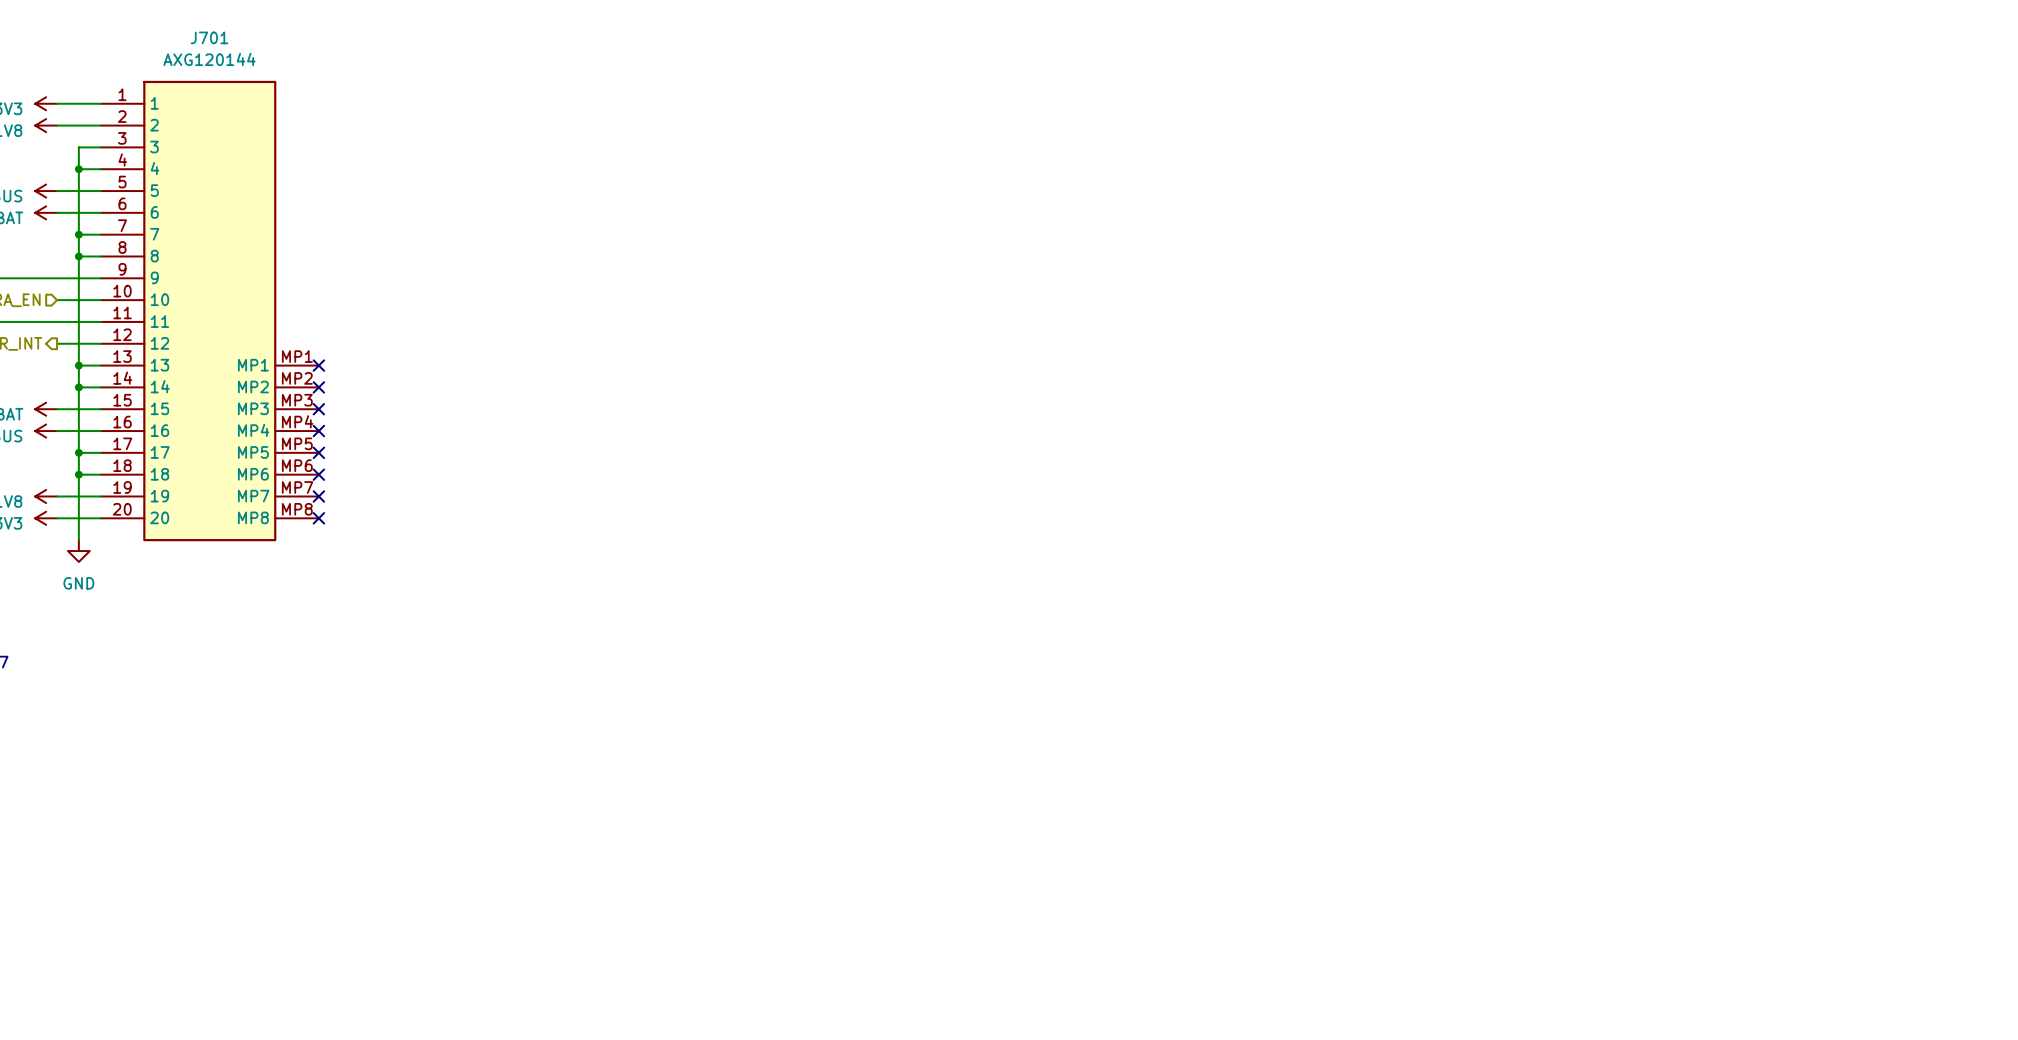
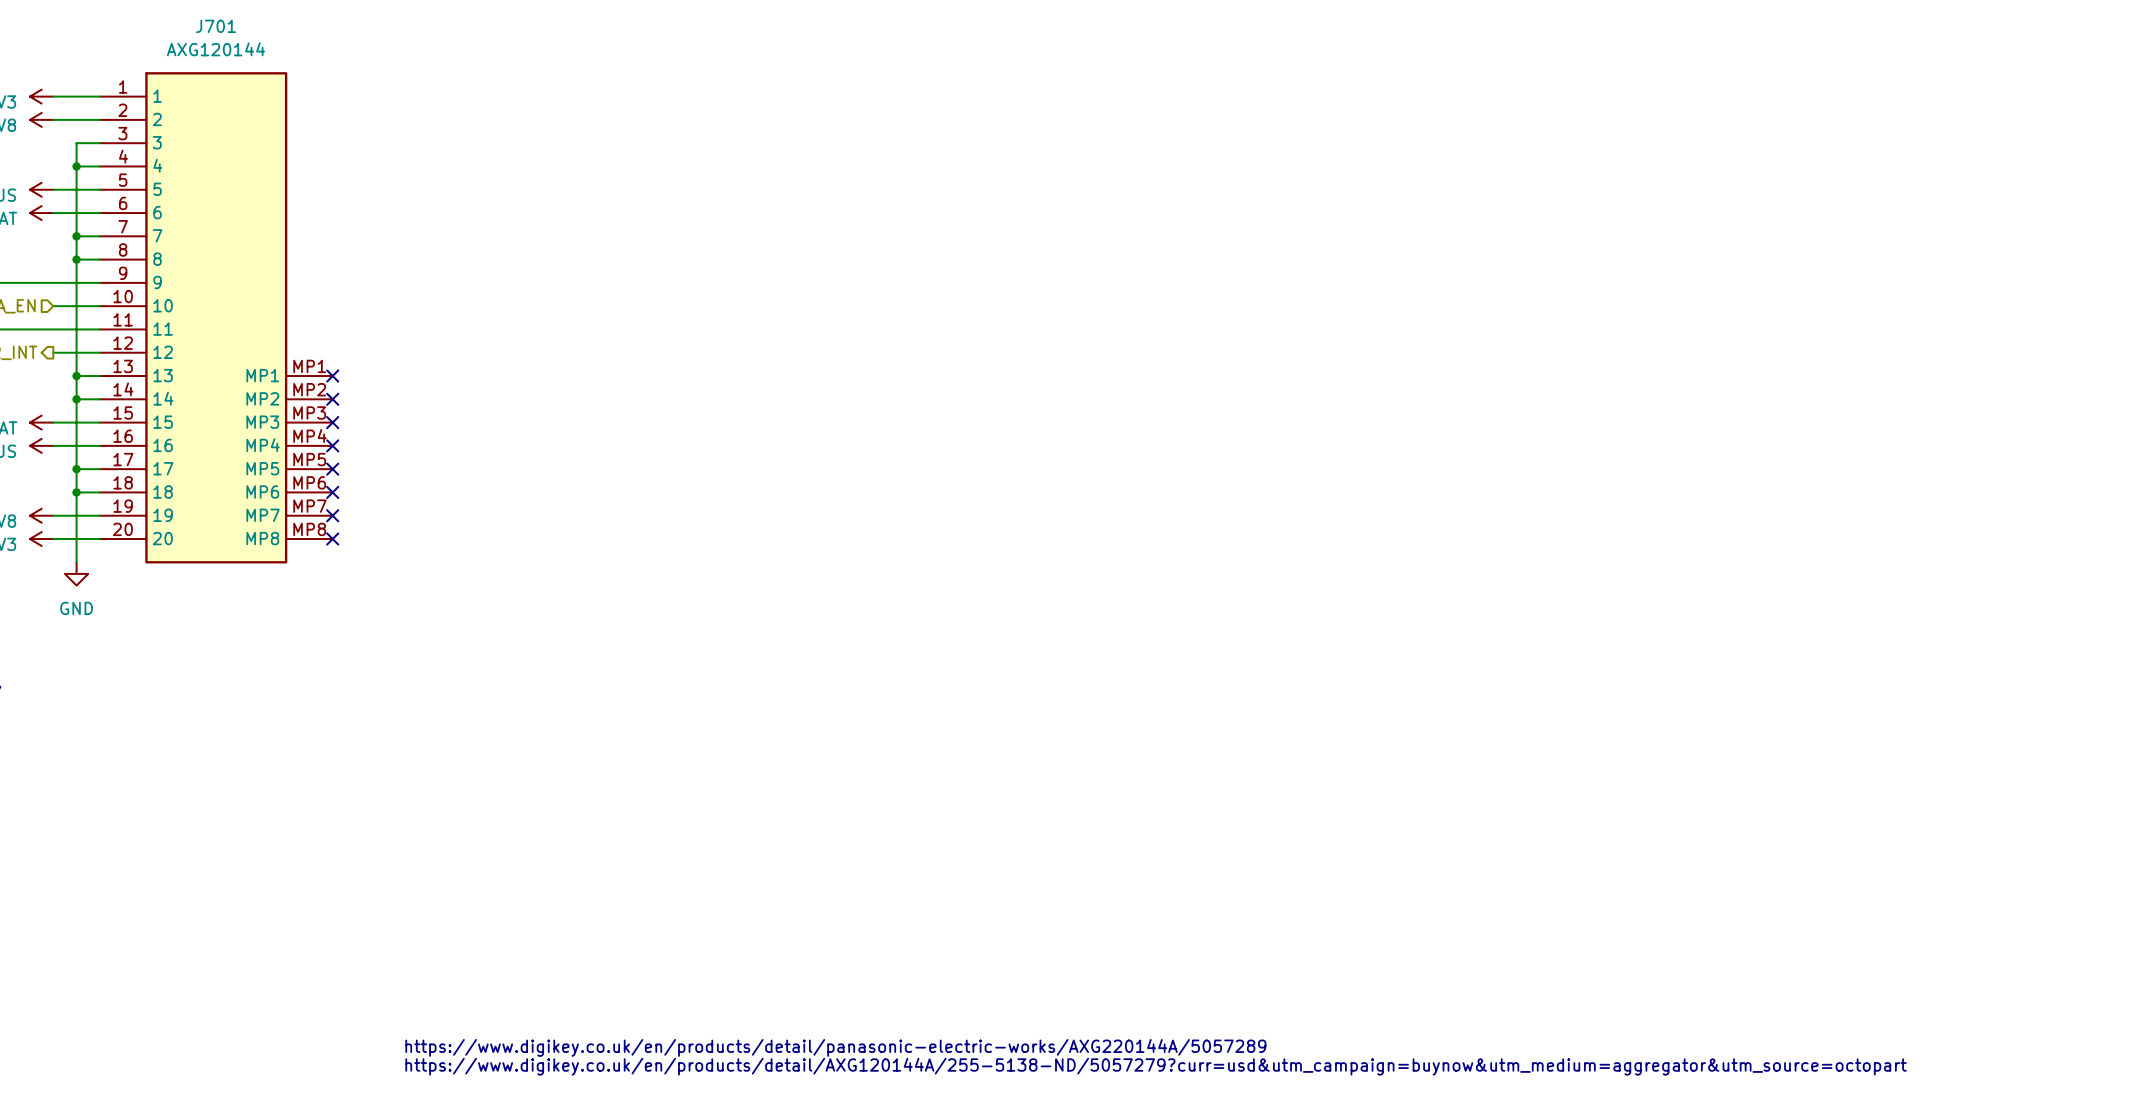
text: none -> https://www.digikey.co.uk/en/products/detail/panasonic-electric-works/AXG220144A/5057289 (835, 1047)
text: none -> https://www.digikey.co.uk/en/products/detail/AXG120144A/255-5138-ND/5057279?curr=usd&utm_campaign=buynow&utm_medium=aggregator&utm_source=octopart (1156, 1066)

